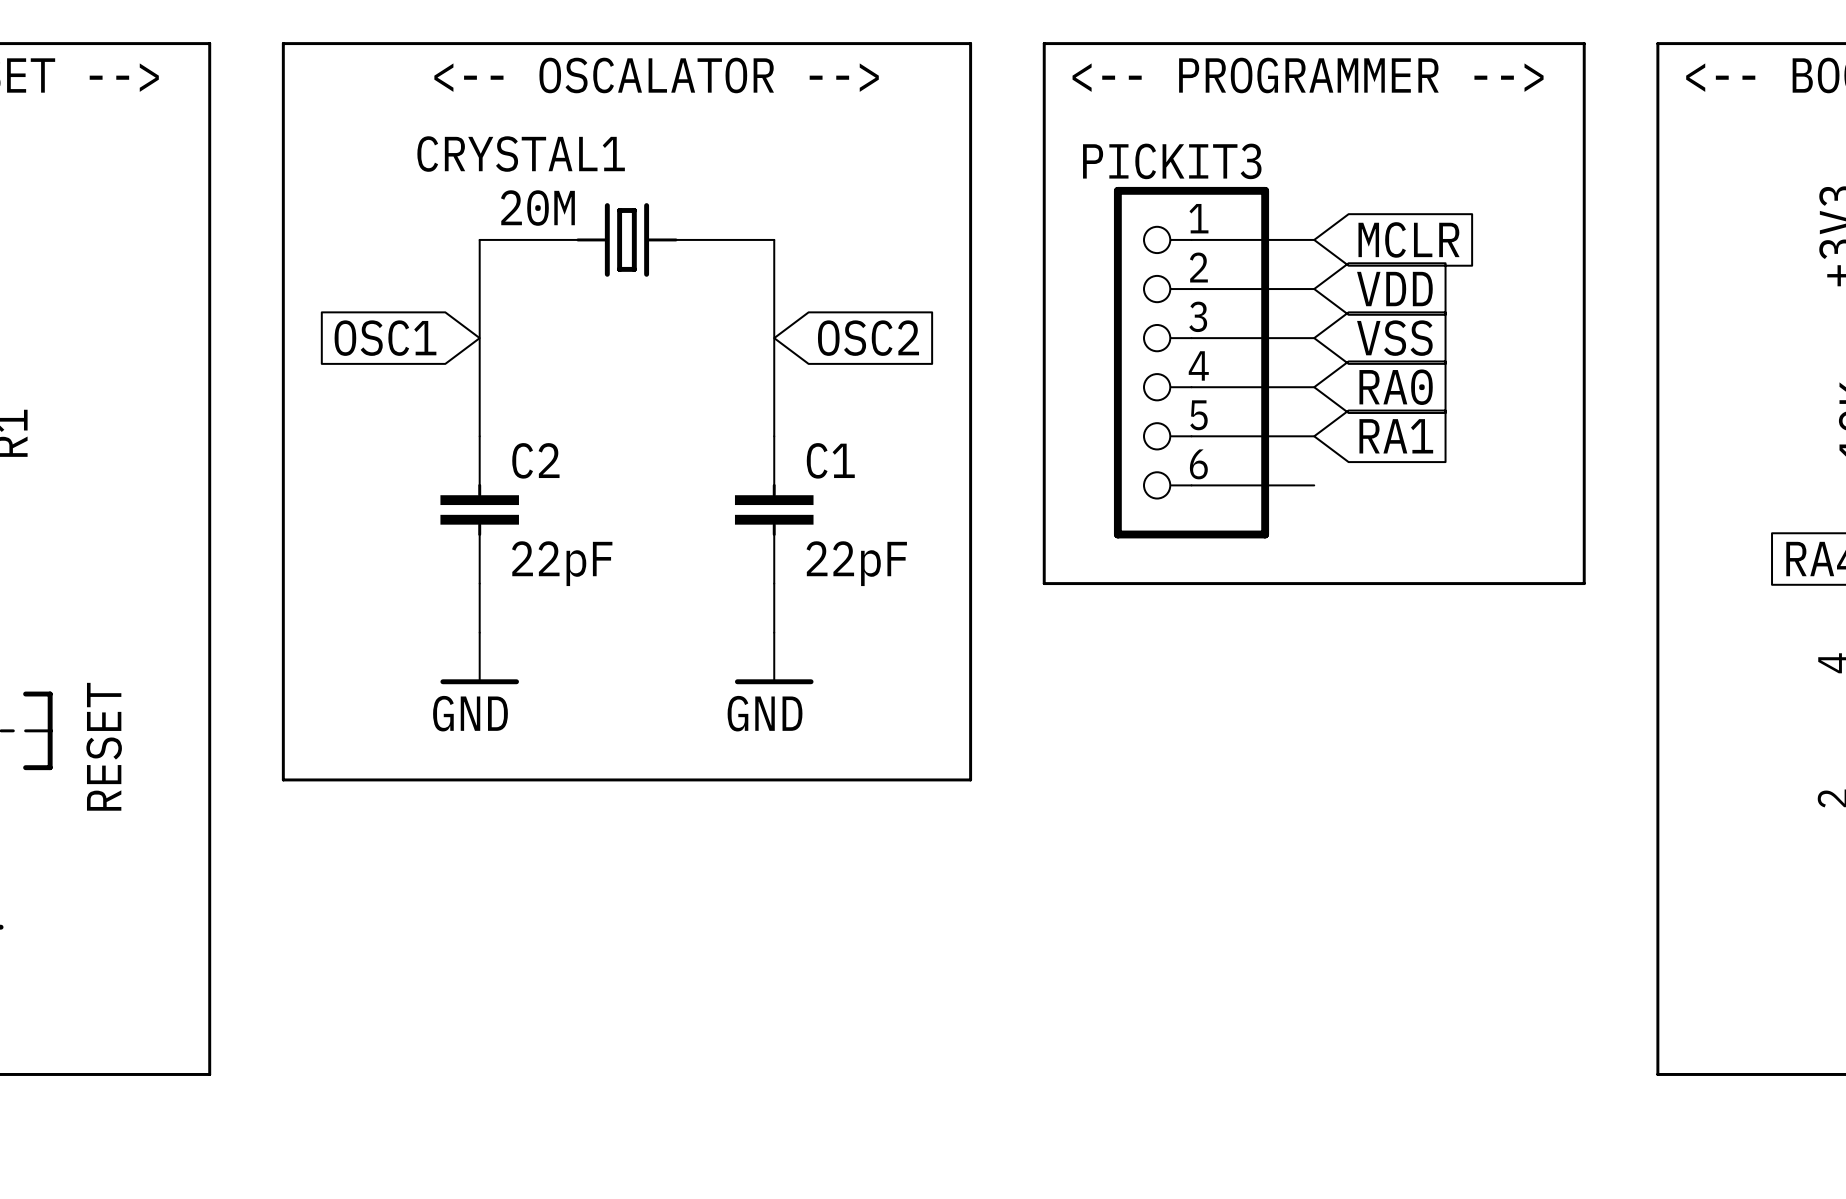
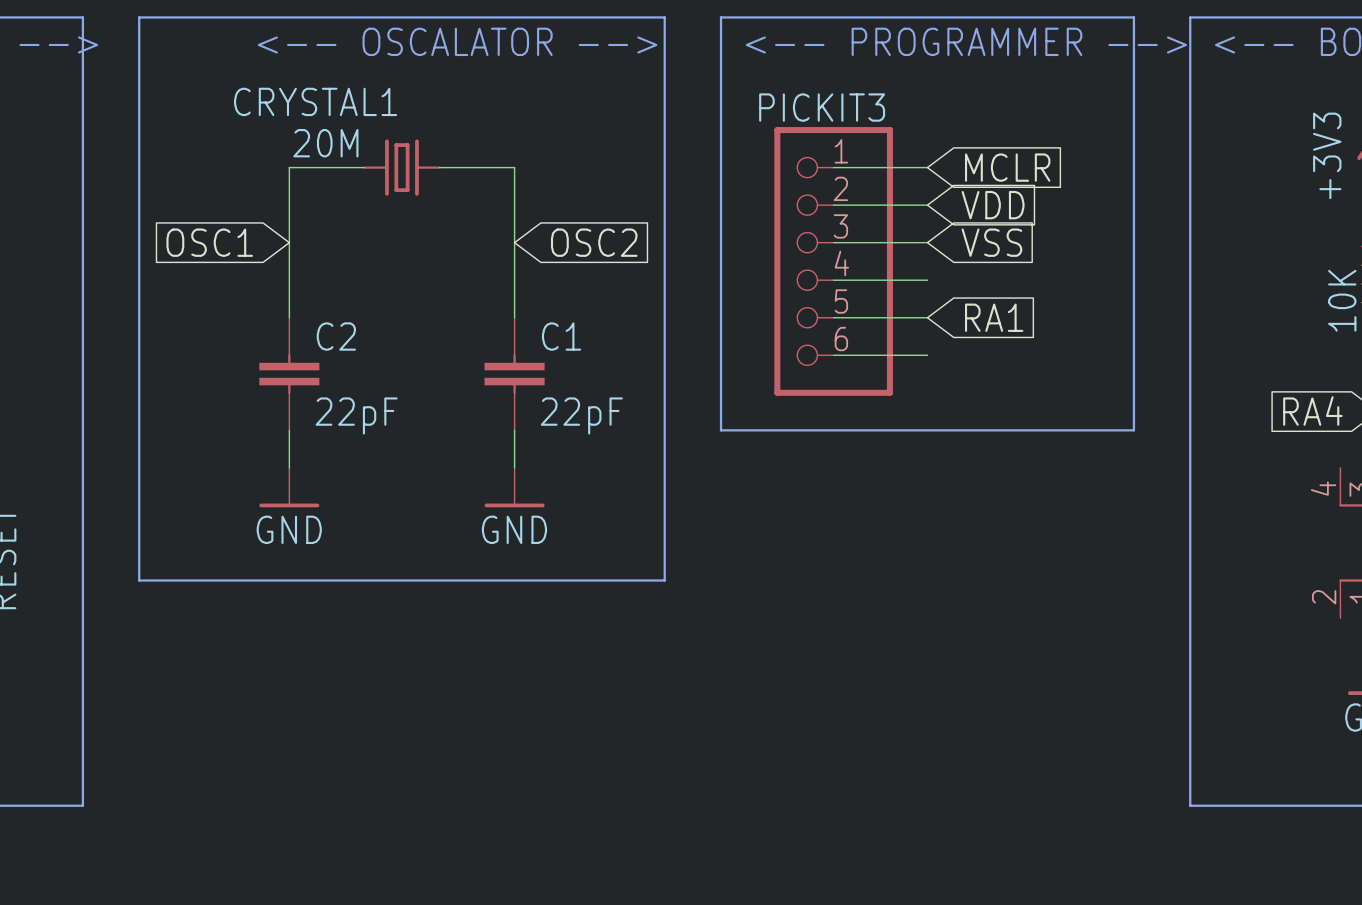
global label: RA0 (1396, 387) -> none

